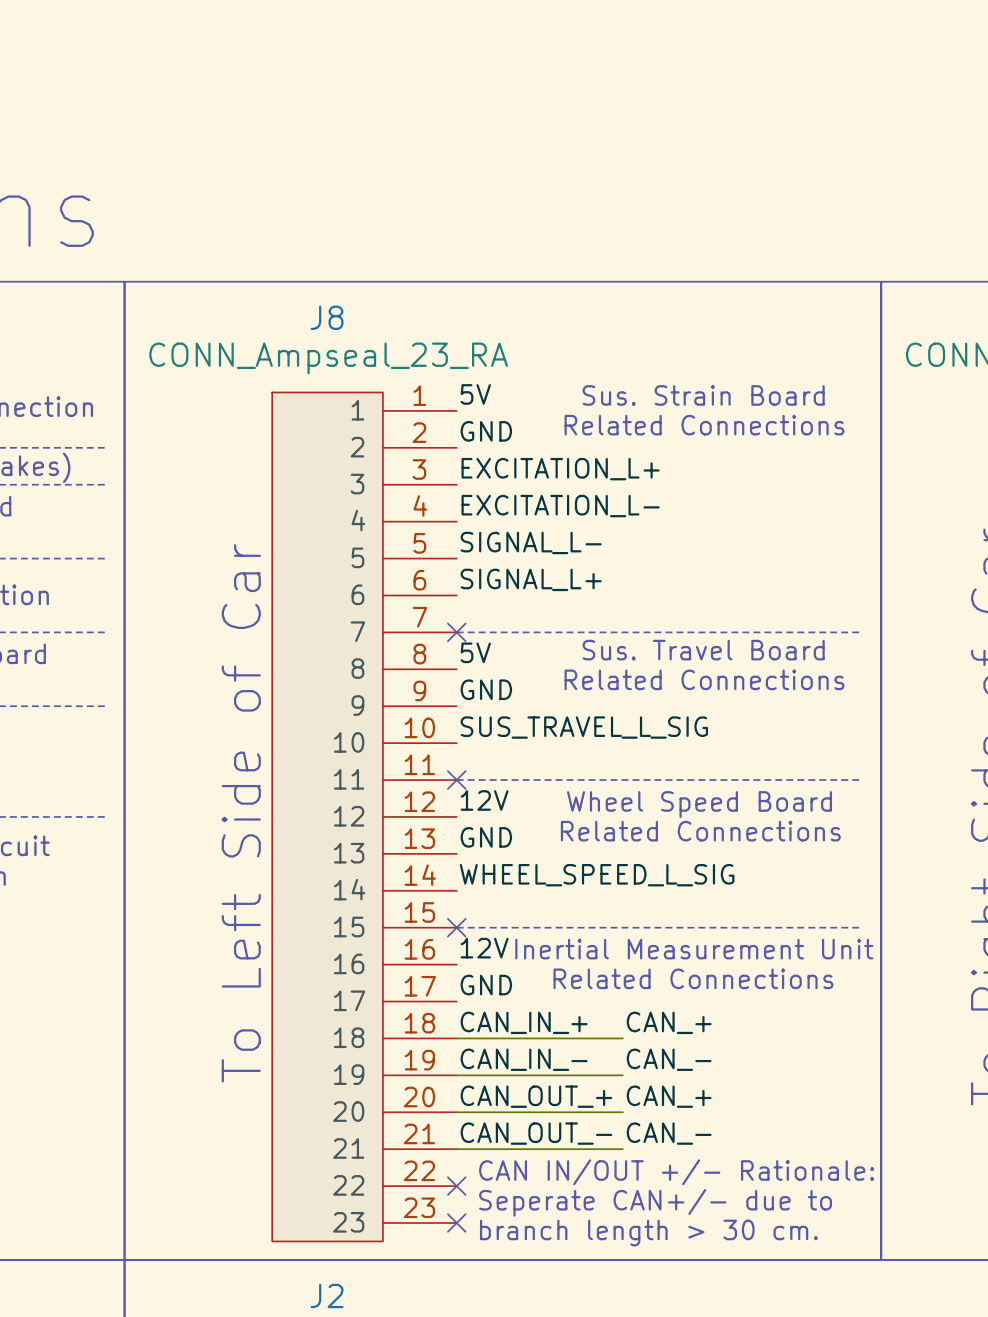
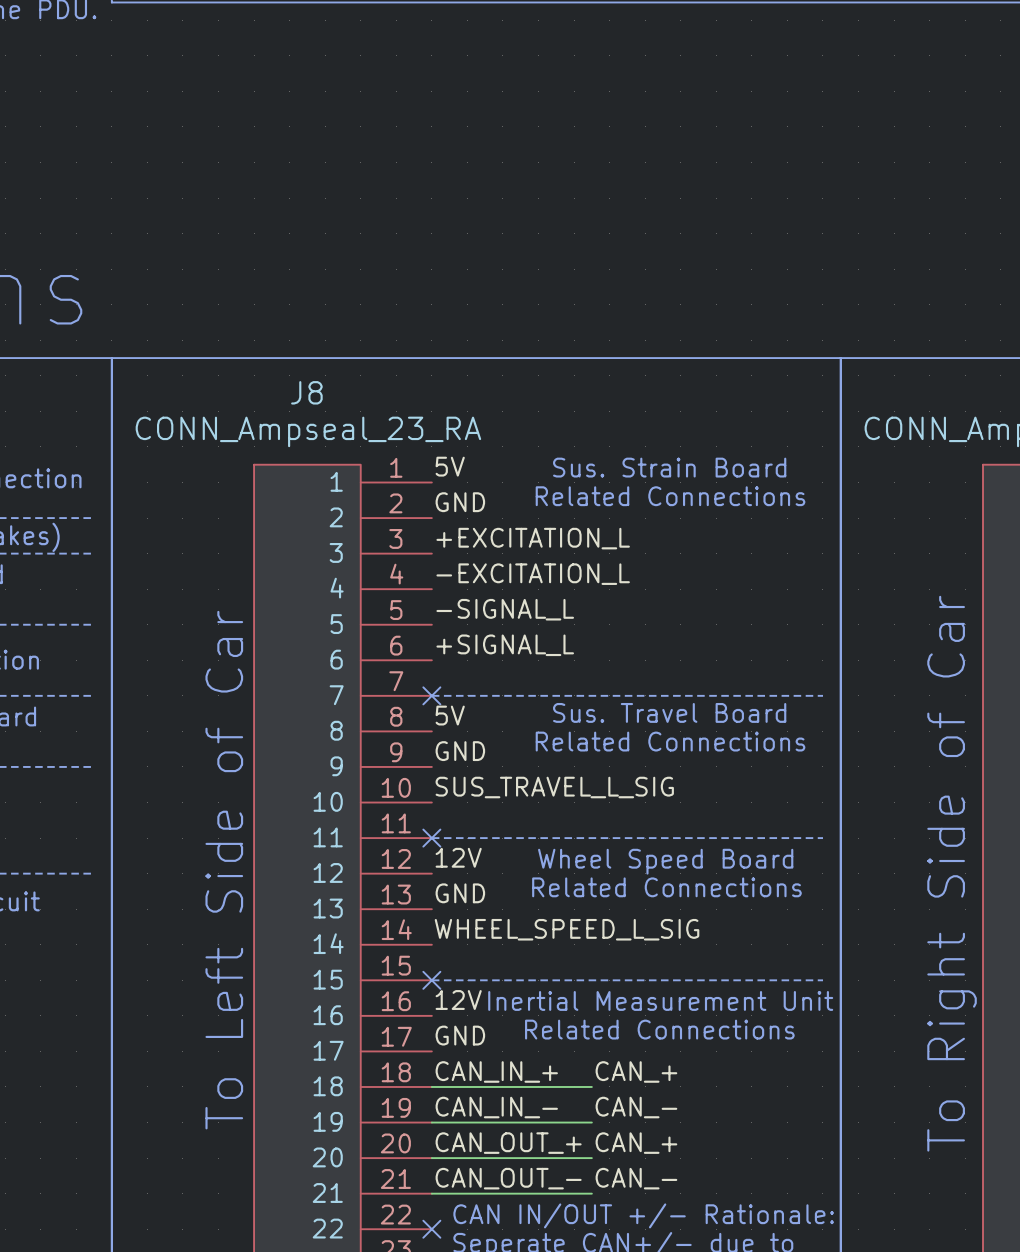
label: EXCITATION_L+ (560, 469) -> +EXCITATION_L (533, 538)
label: EXCITATION_L- (560, 506) -> -EXCITATION_L (533, 574)
label: SIGNAL_L- (531, 542) -> -SIGNAL_L (505, 609)
label: SIGNAL_L+ (531, 579) -> +SIGNAL_L (505, 645)

